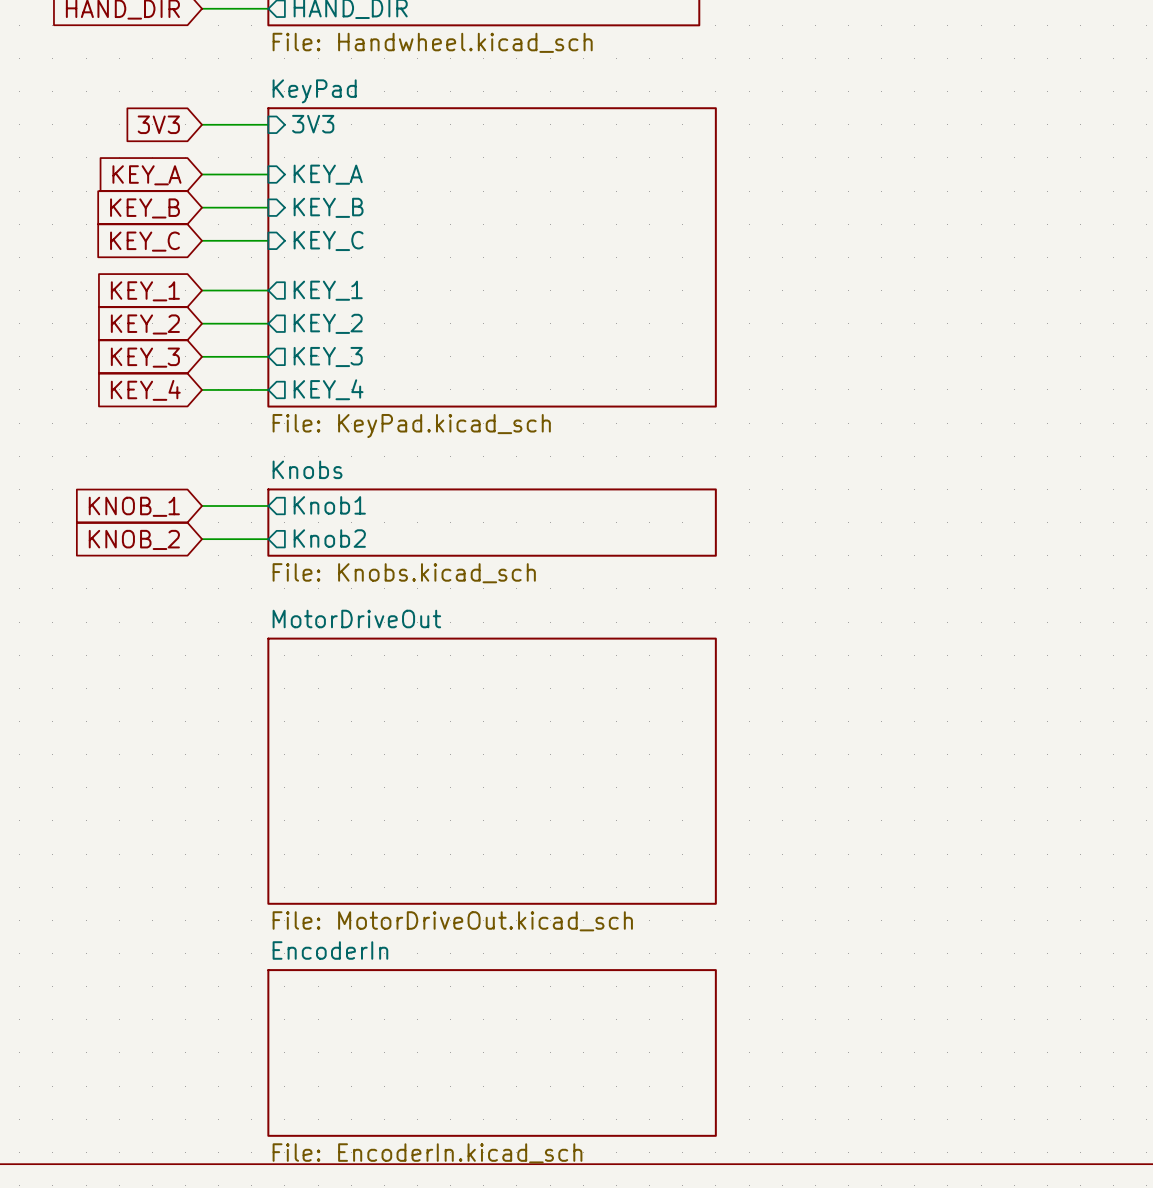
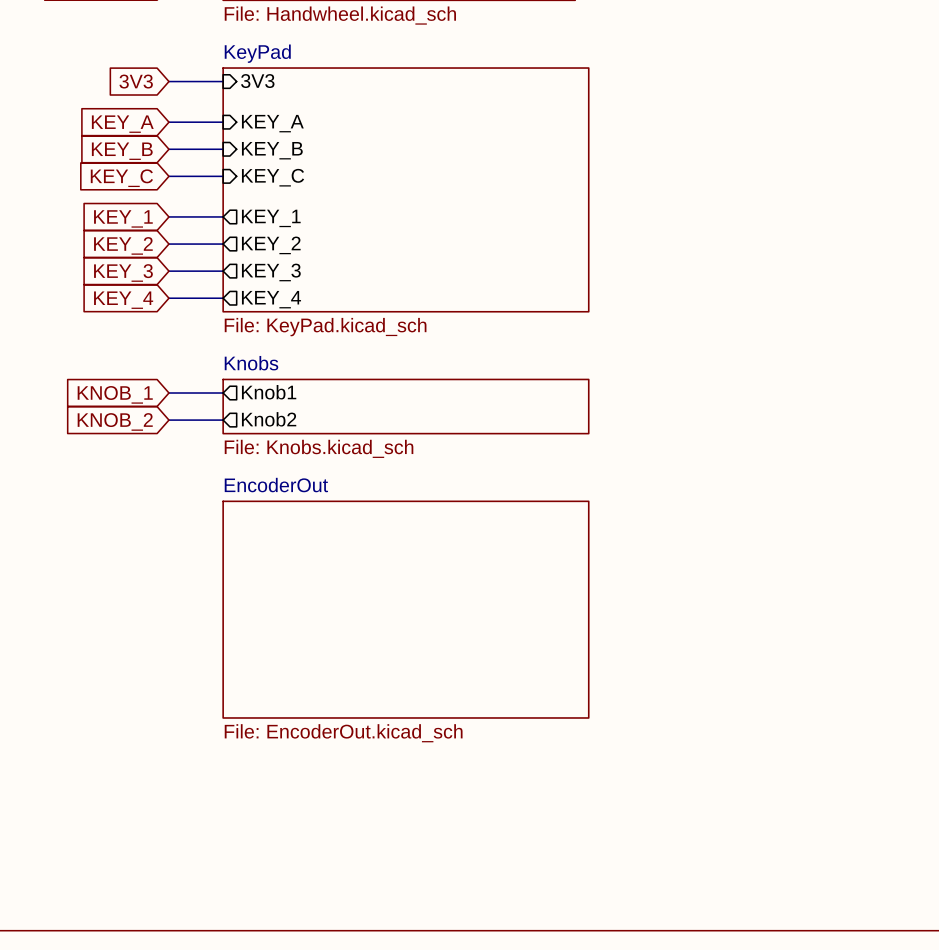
sheet MotorDriveOut name: MotorDriveOut (356, 618) -> EncoderOut (276, 485)
sheet MotorDriveOut value: File: MotorDriveOut.kicad_sch (452, 921) -> File: EncoderOut.kicad_sch (343, 733)
sheet EncoderIn: File: EncoderIn.kicad_sch (492, 1052) -> none

